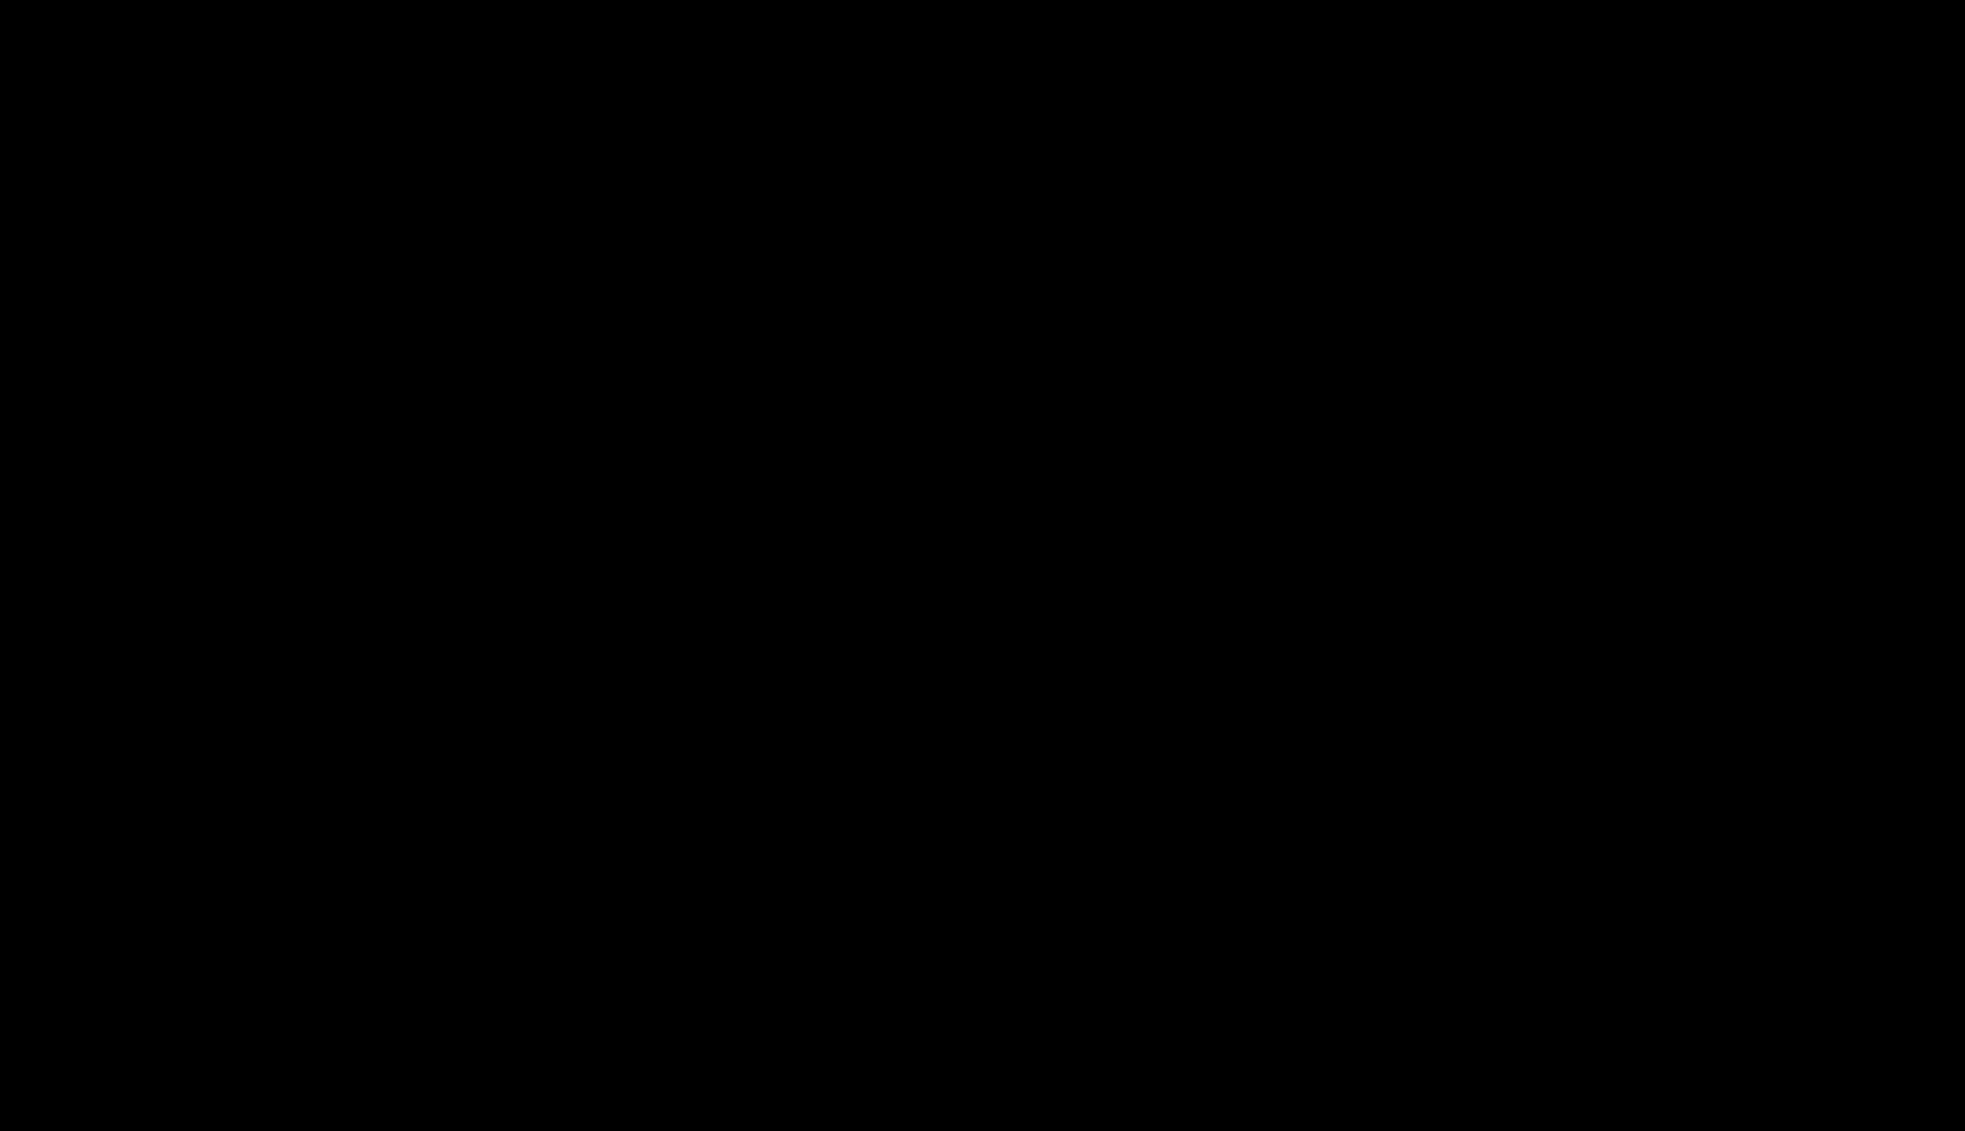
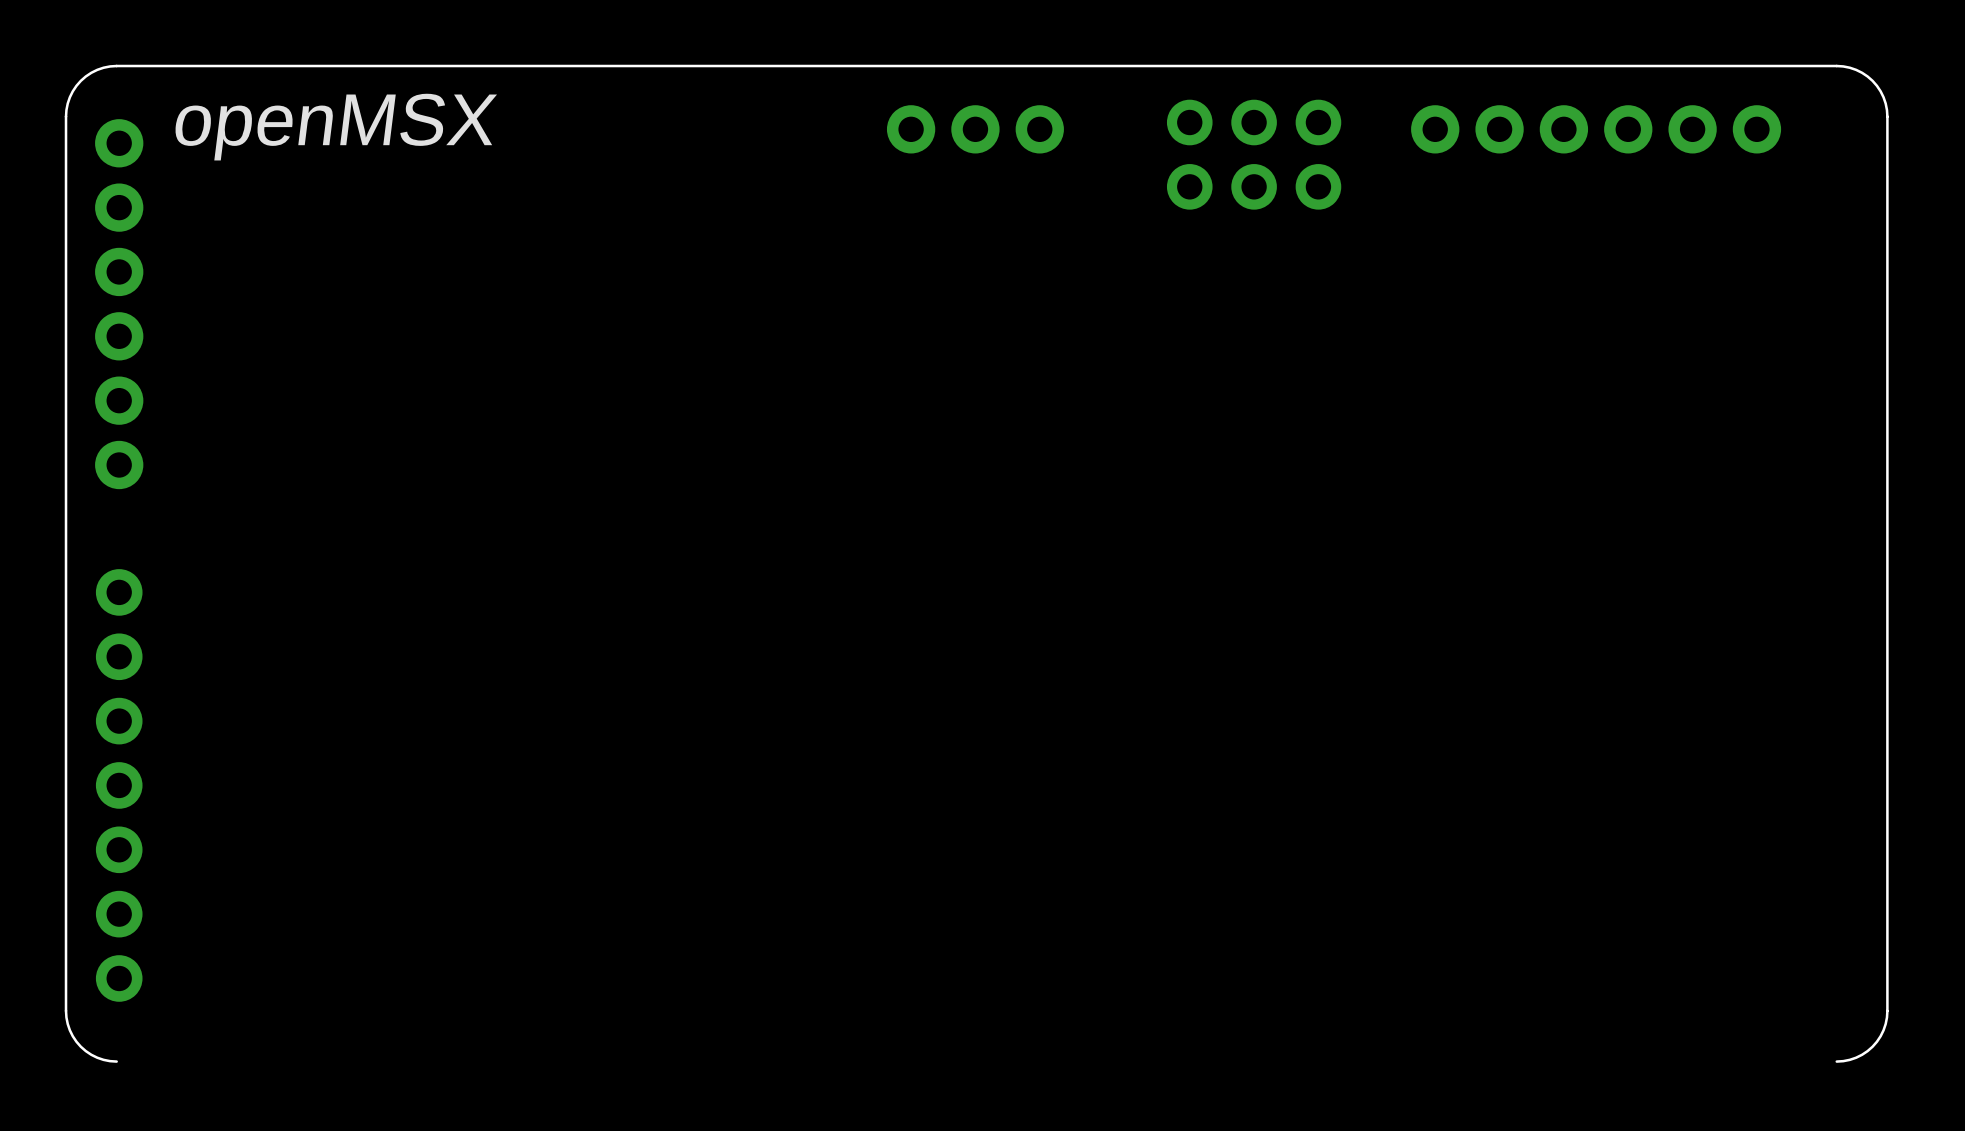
text: none -> openMSX (335, 127)
part: none -> (975, 129)
part: none -> (1596, 129)
part: none -> (1254, 154)
part: none -> (119, 304)
part: none -> (119, 785)
board edge: none -> (1836, 1061) (1856, 1057) (1872, 1046) (1883, 1030) (1887, 1010) (1887, 116) (1883, 97) (1872, 80) (1856, 69) (1836, 66) (116, 66) (103, 67) (91, 72) (80, 80) (72, 91) (67, 103) (66, 116) (66, 1010) (69, 1030) (80, 1046) (97, 1057) (116, 1061)

